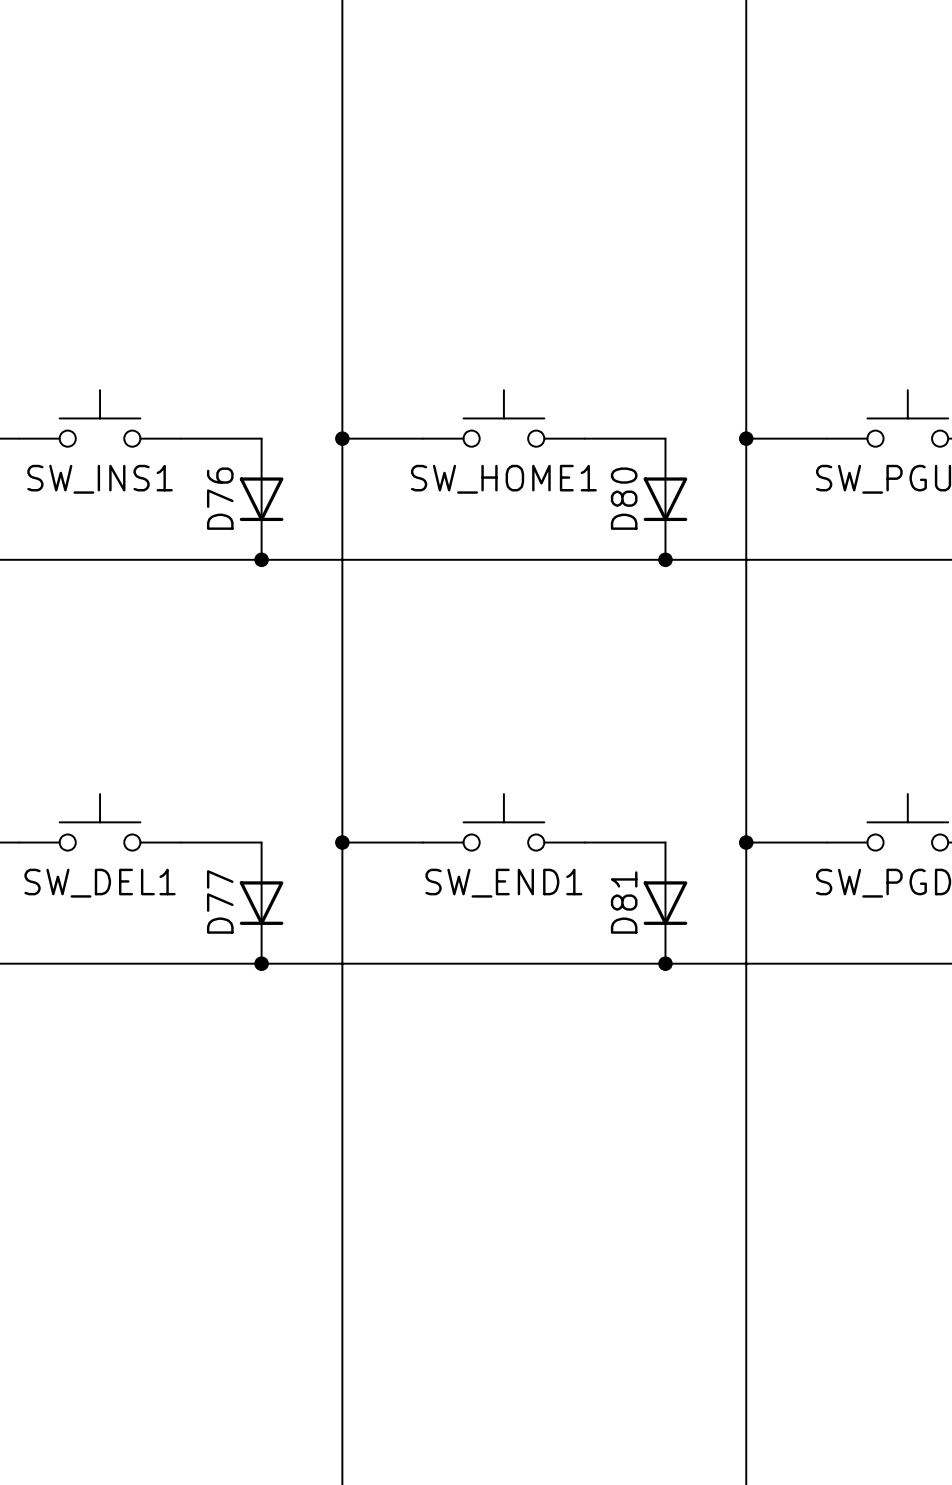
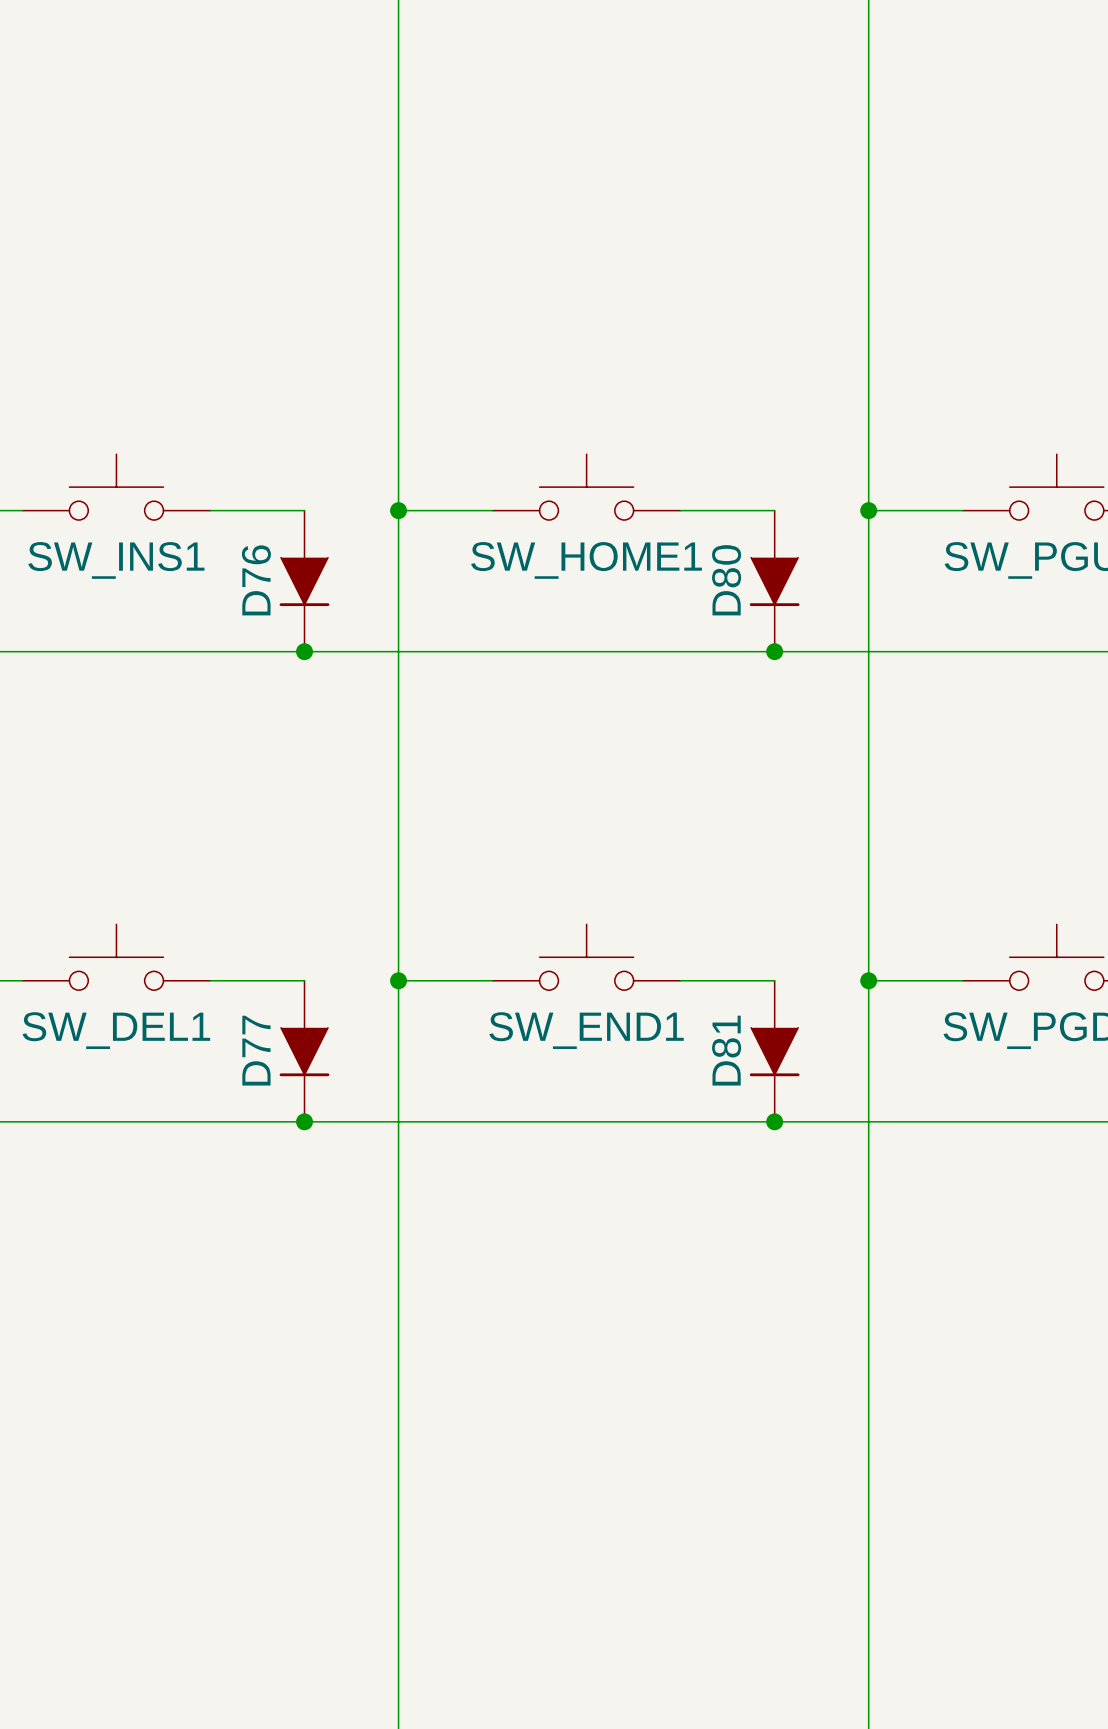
D76 symbol: [239, 438, 284, 560] -> [279, 510, 330, 652]
D80 symbol: [643, 438, 688, 560] -> [749, 510, 800, 652]
D77 symbol: [239, 842, 284, 964] -> [279, 980, 330, 1122]
D81 symbol: [643, 842, 688, 964] -> [749, 980, 800, 1122]

